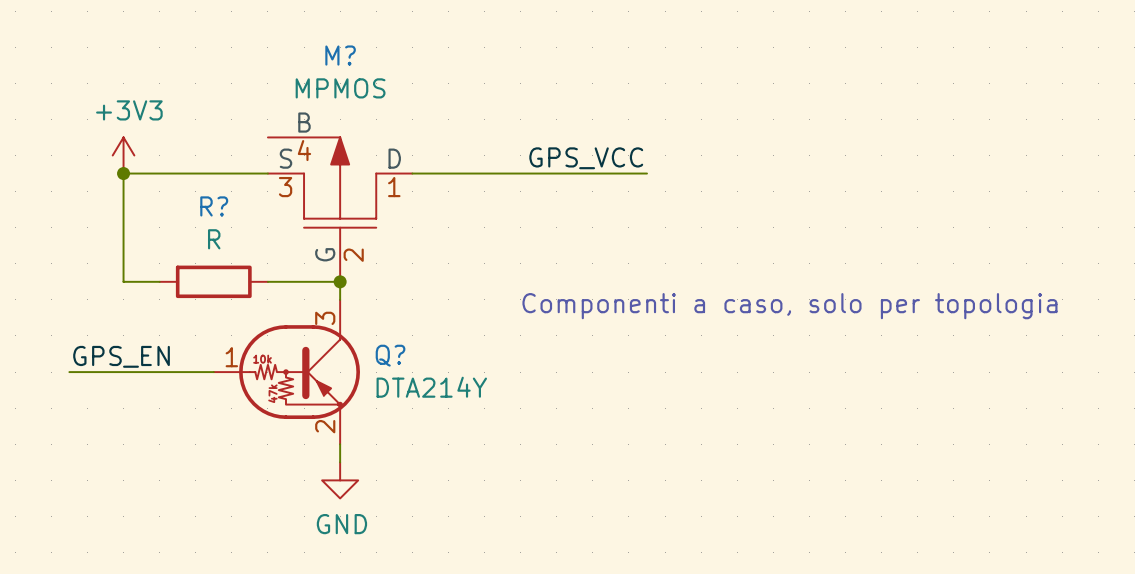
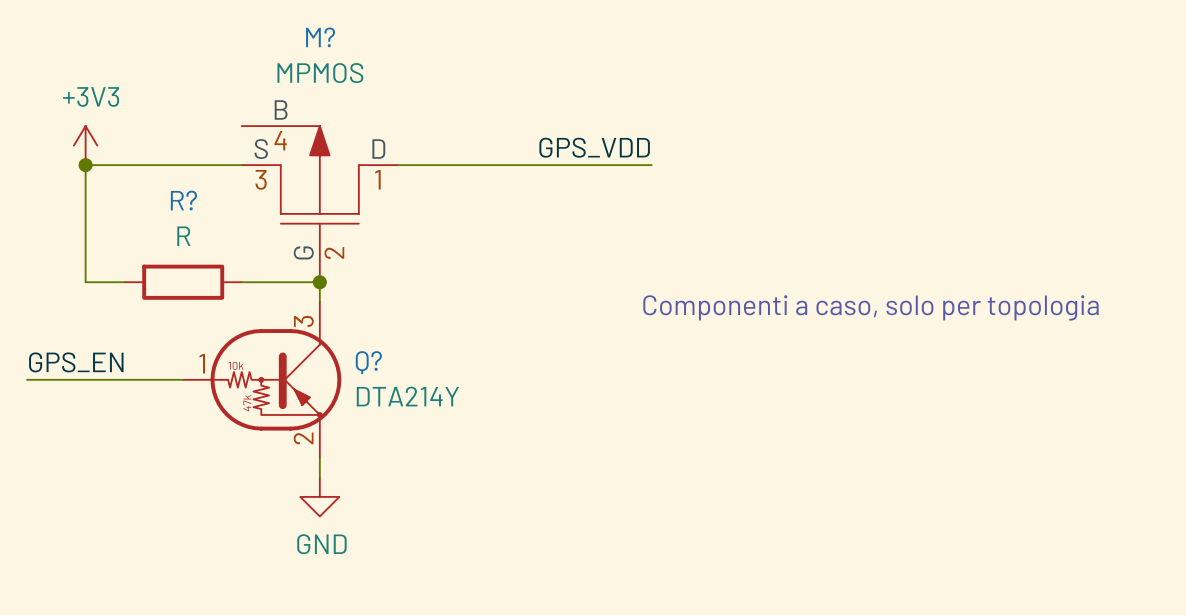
label: GPS_VCC (586, 158) -> GPS_VDD (594, 147)

